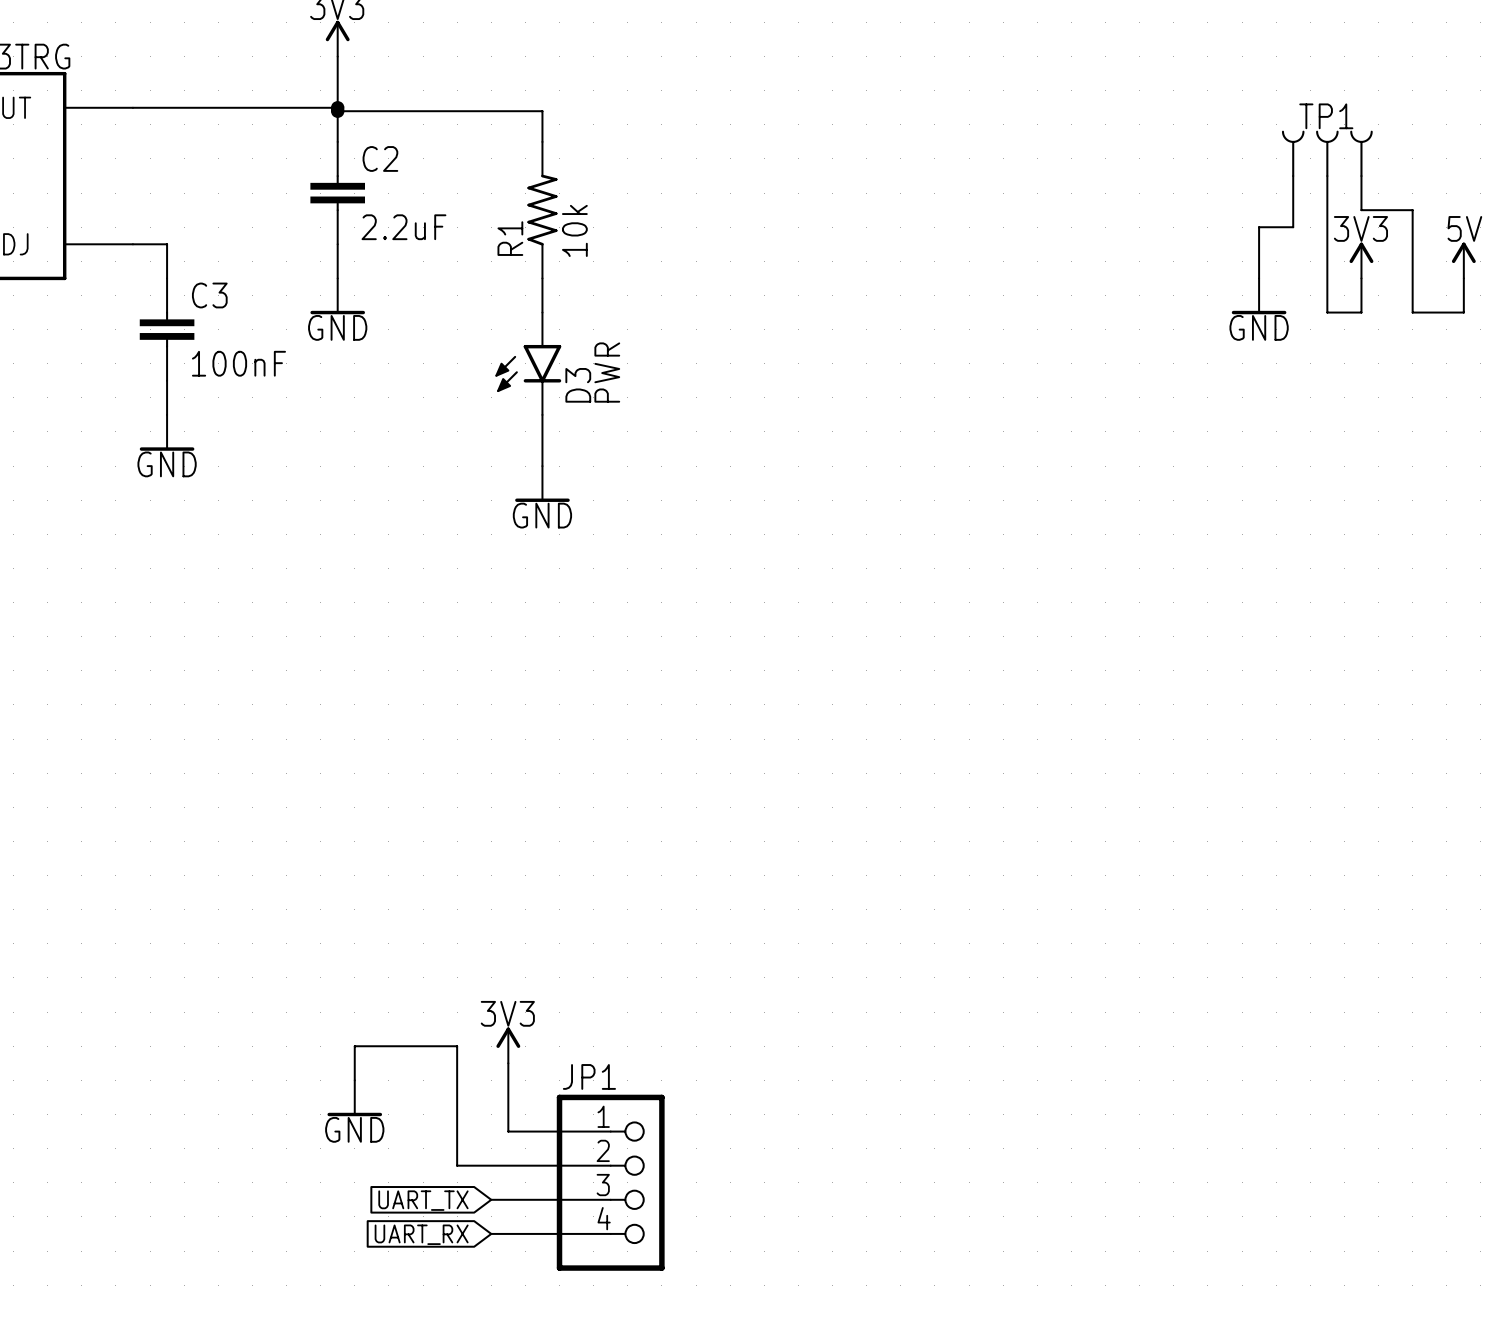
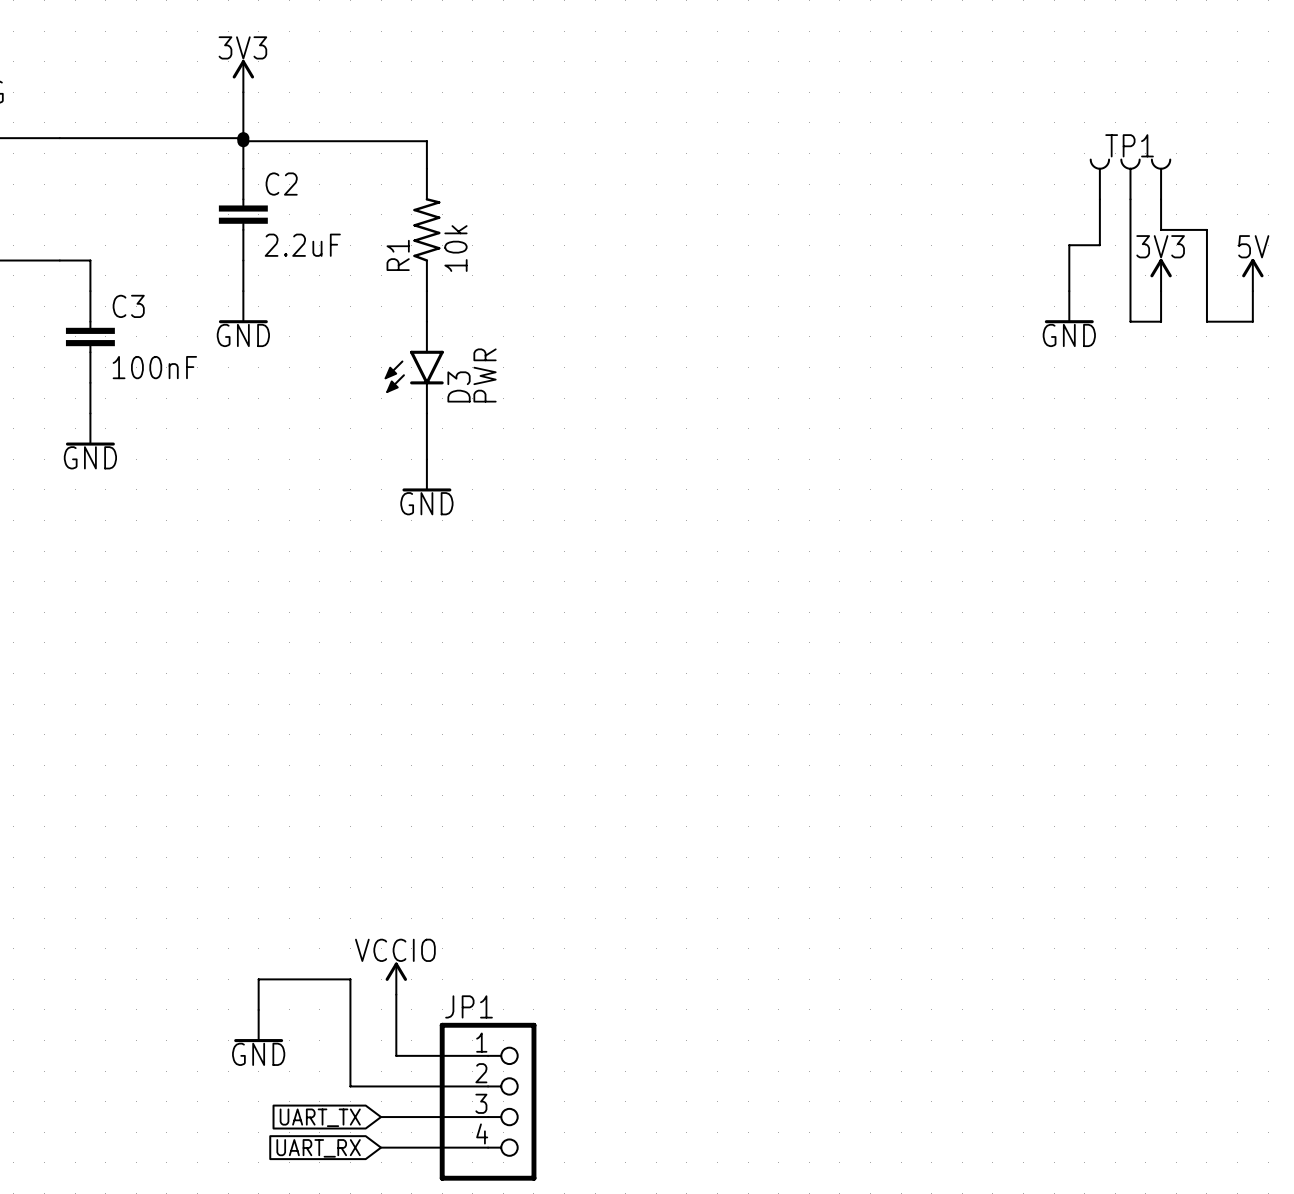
power symbol: 3V3 (508, 1045) -> VCCIO (396, 978)

